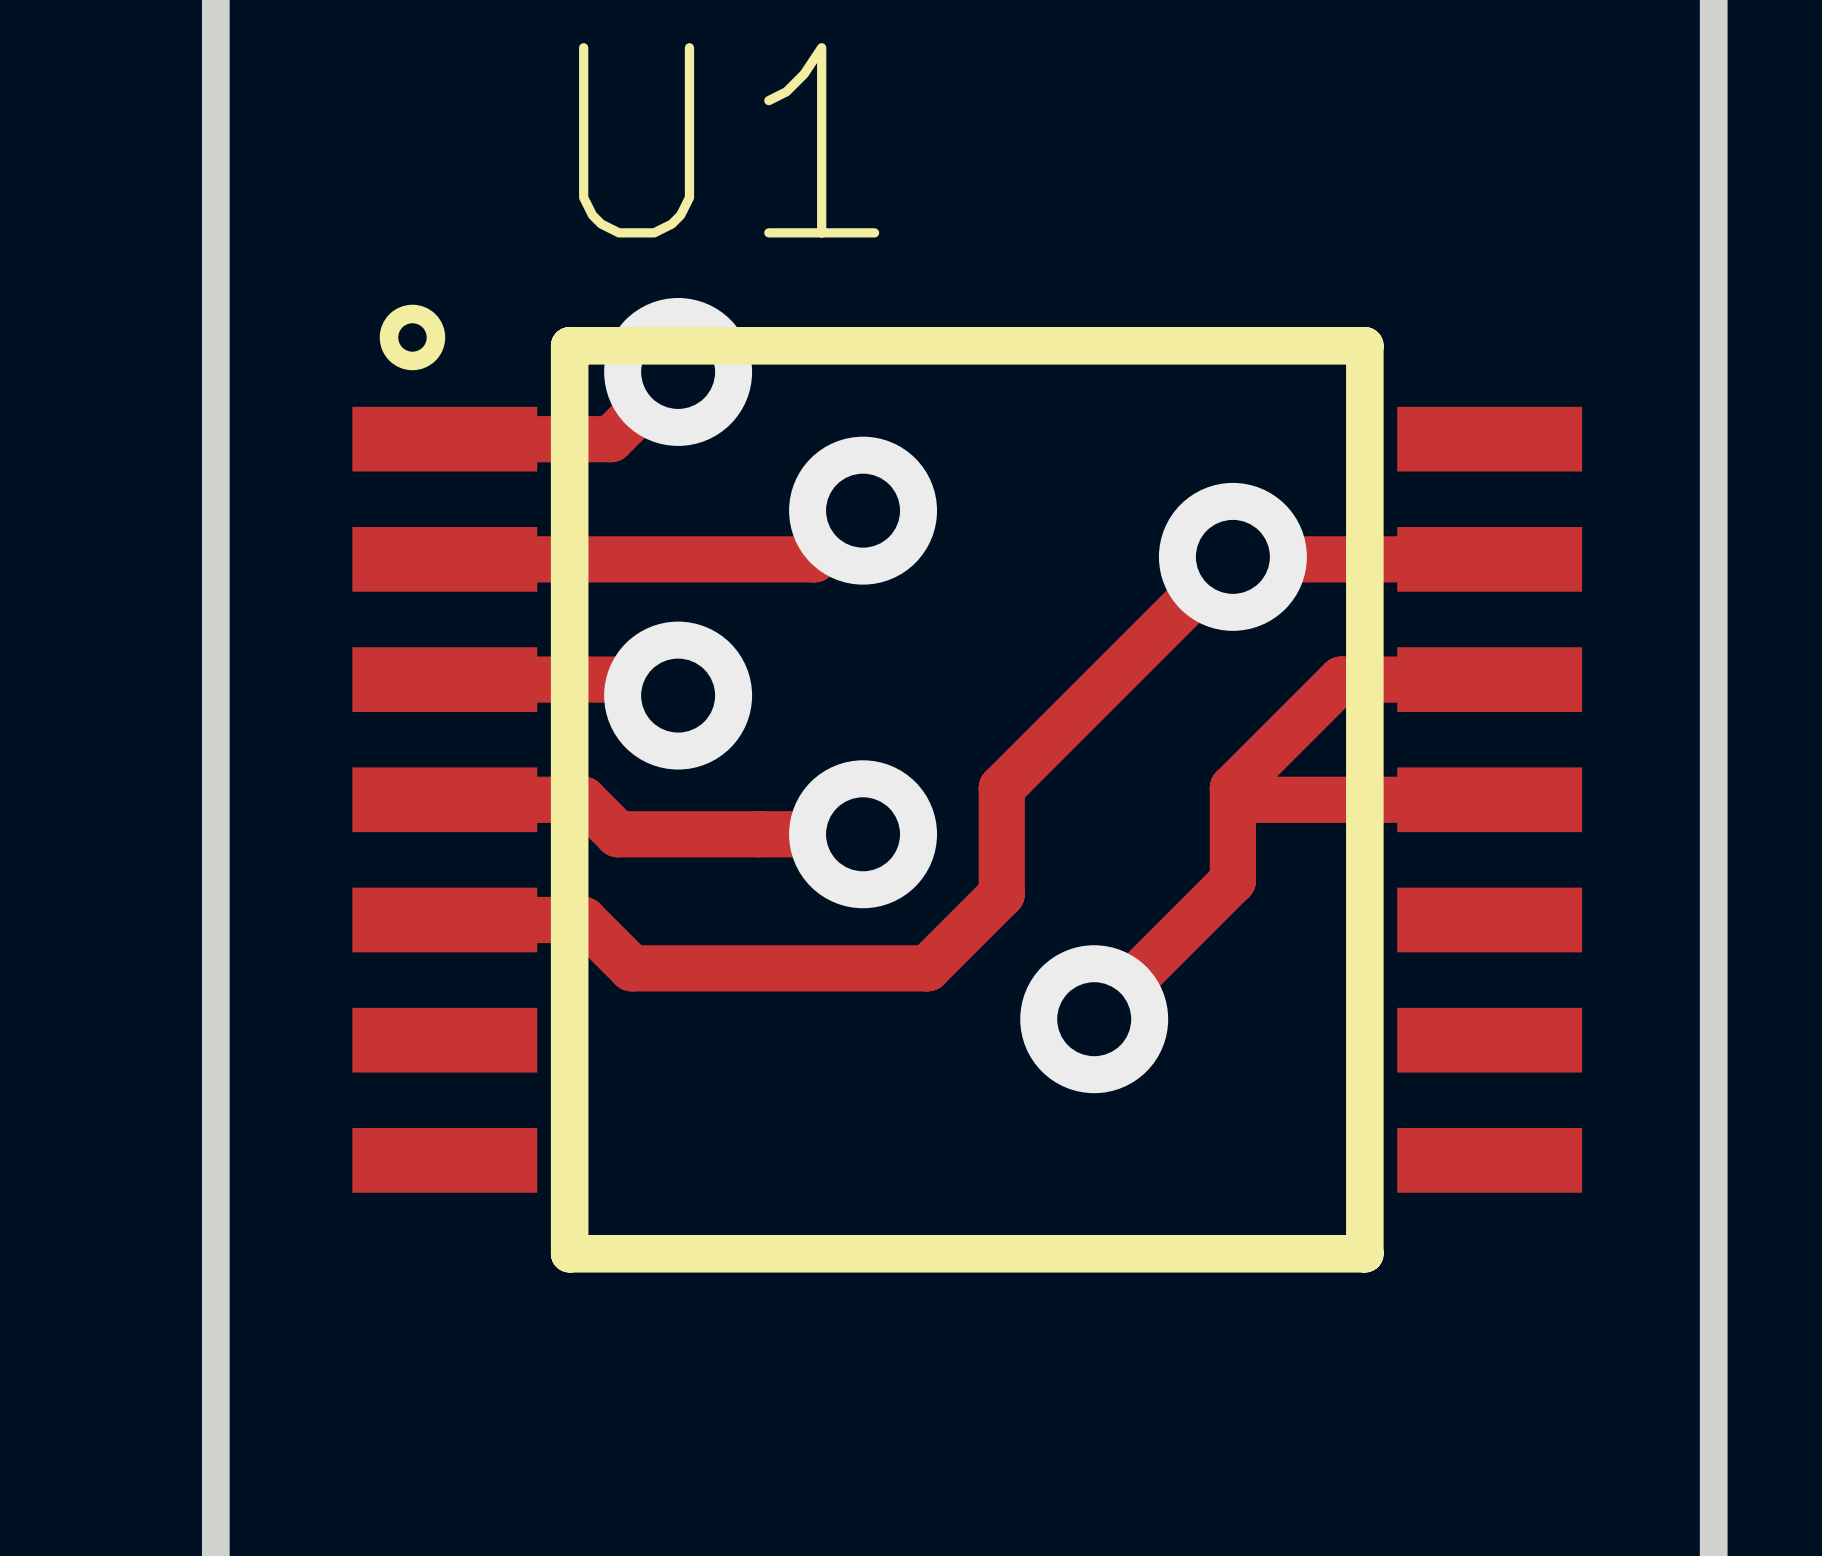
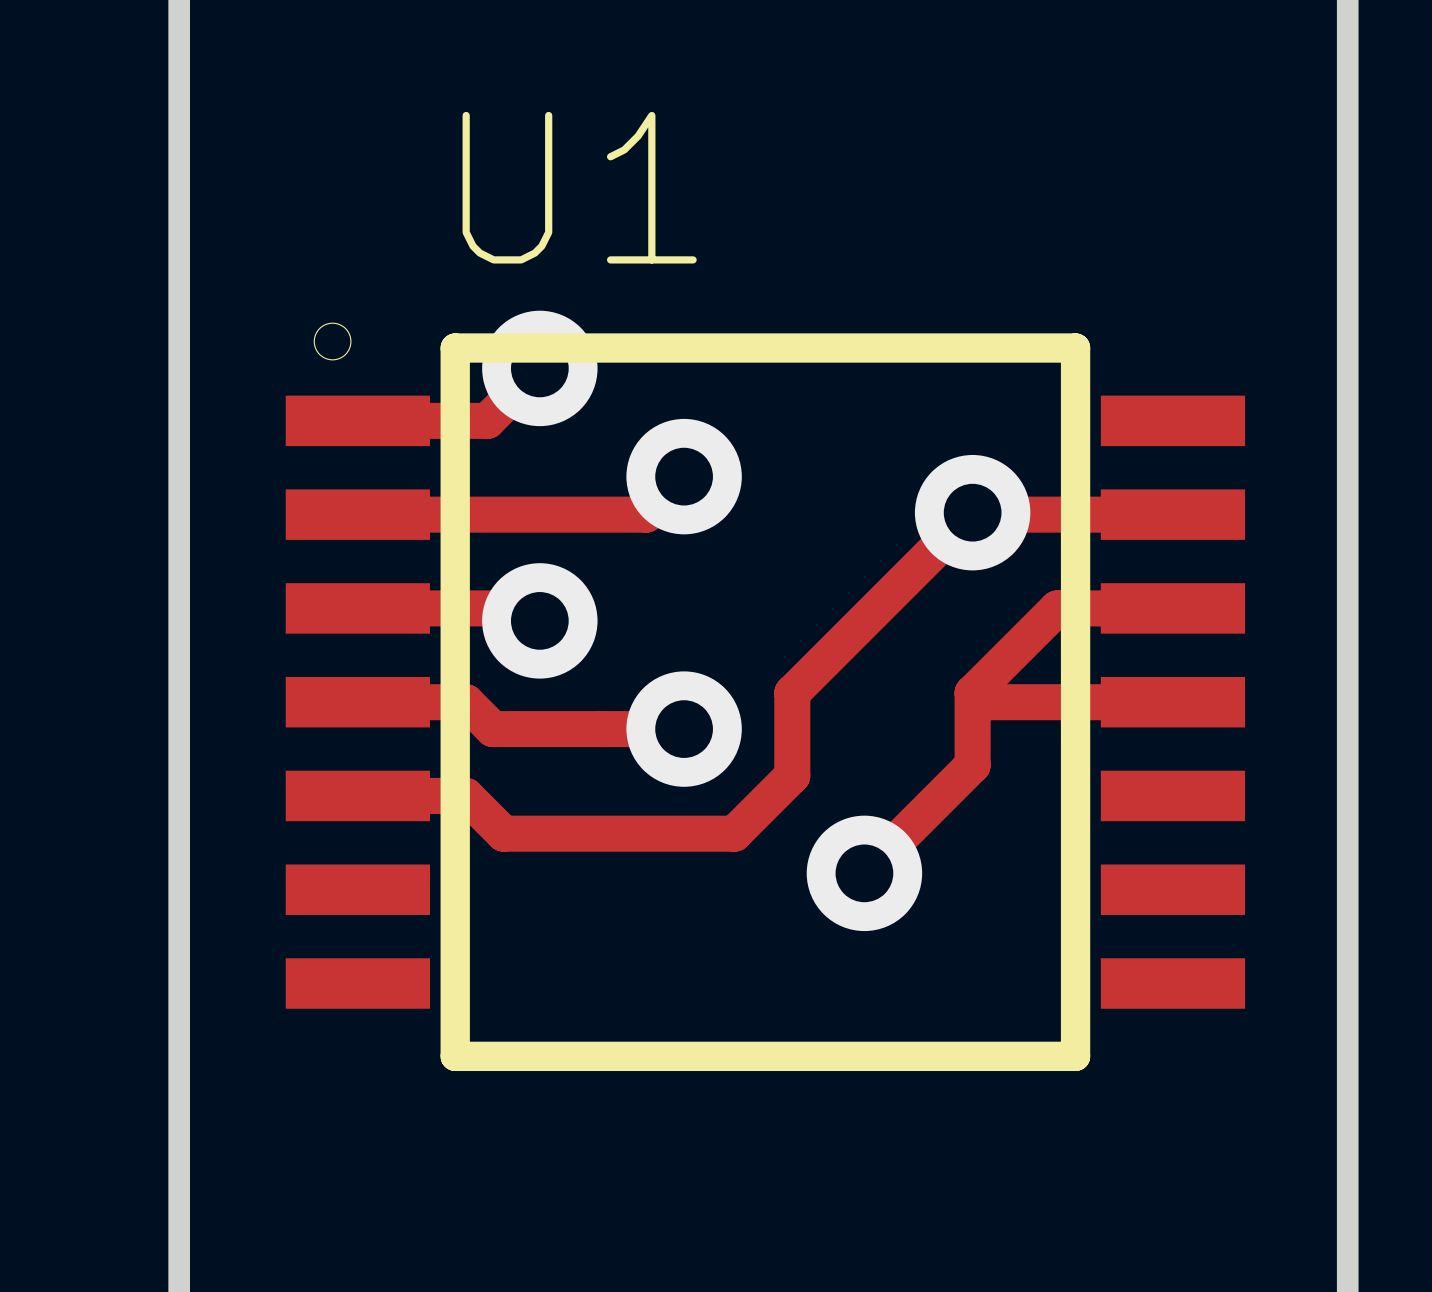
U1 footprint: [352, 304, 1583, 1273] -> [285, 323, 1246, 1072]

